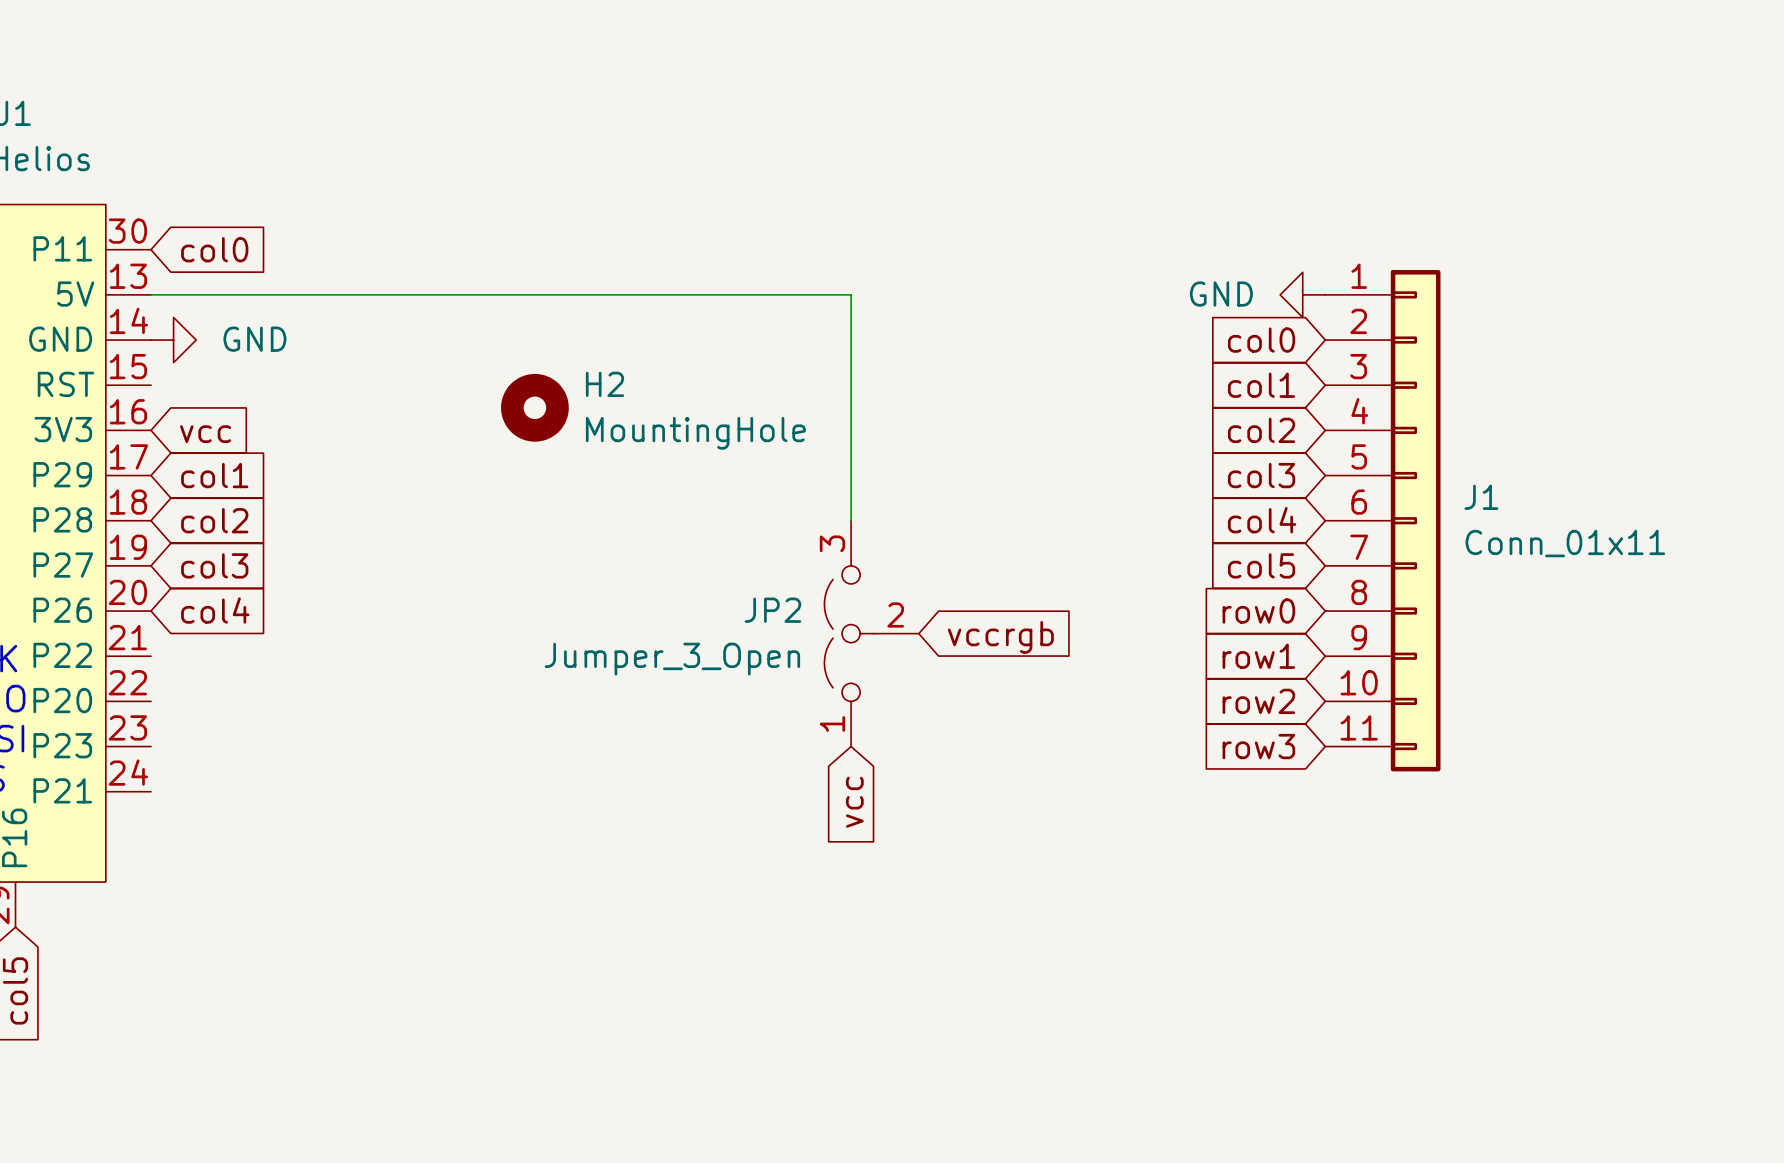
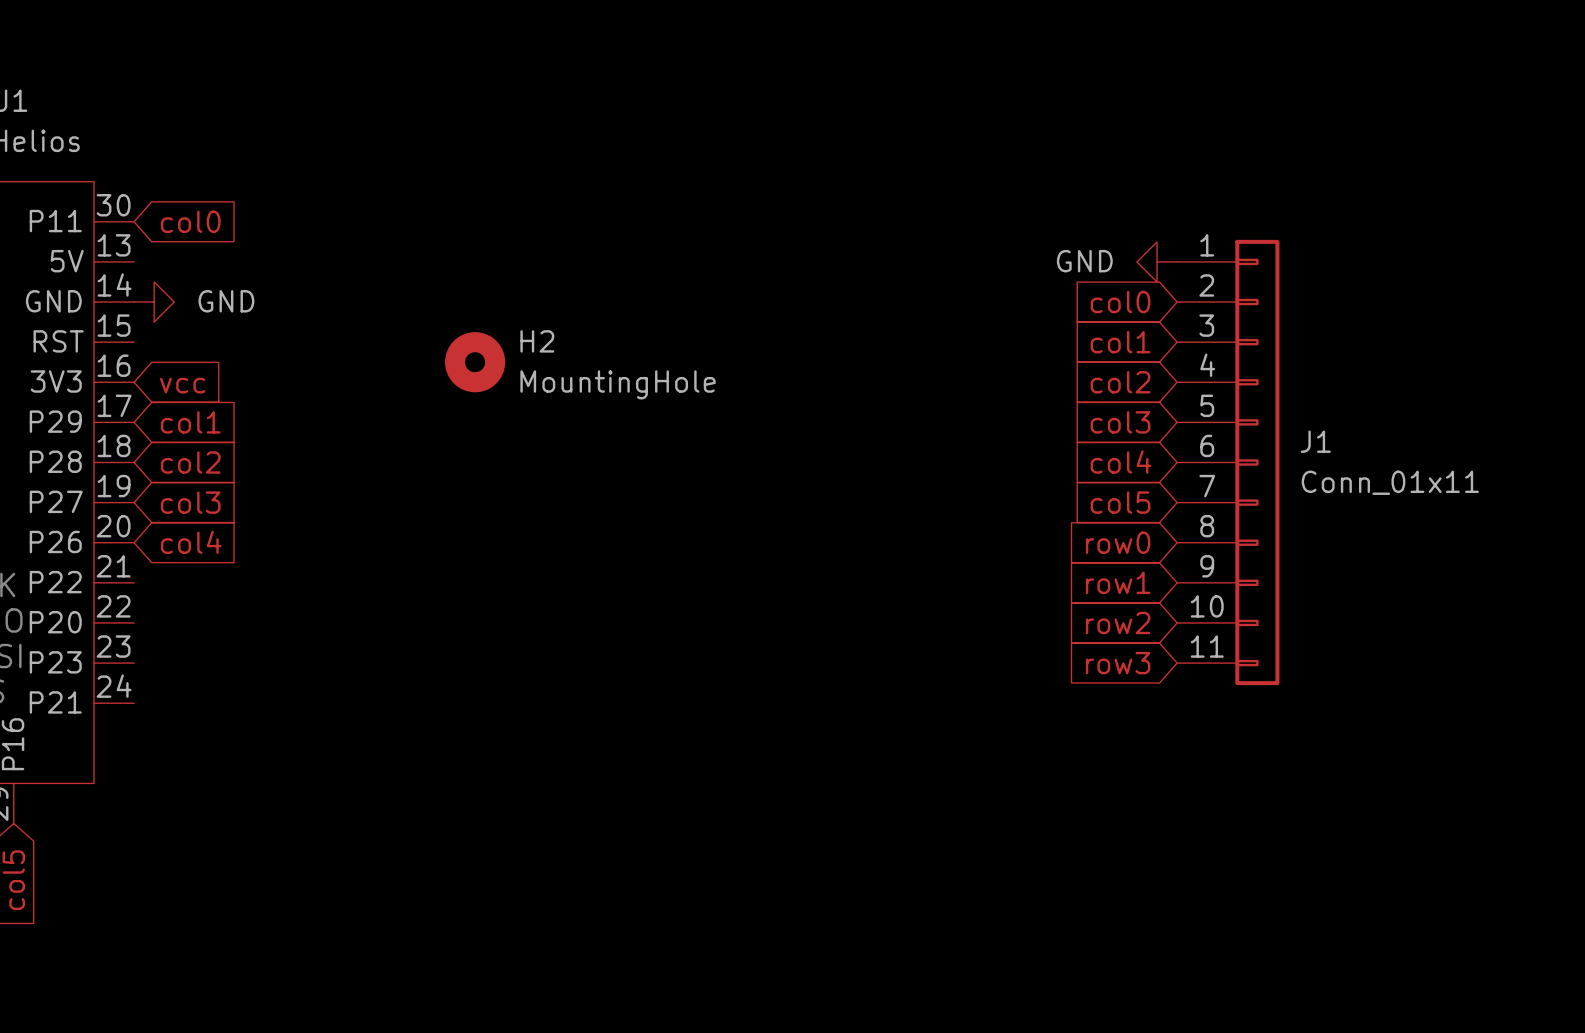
wire: (151, 294) (851, 294) (851, 520) -> none
JP2: Jumper_3_Open (871, 633) -> none
global label: vccrgb (1000, 637) -> none
global label: vcc (854, 802) -> none

